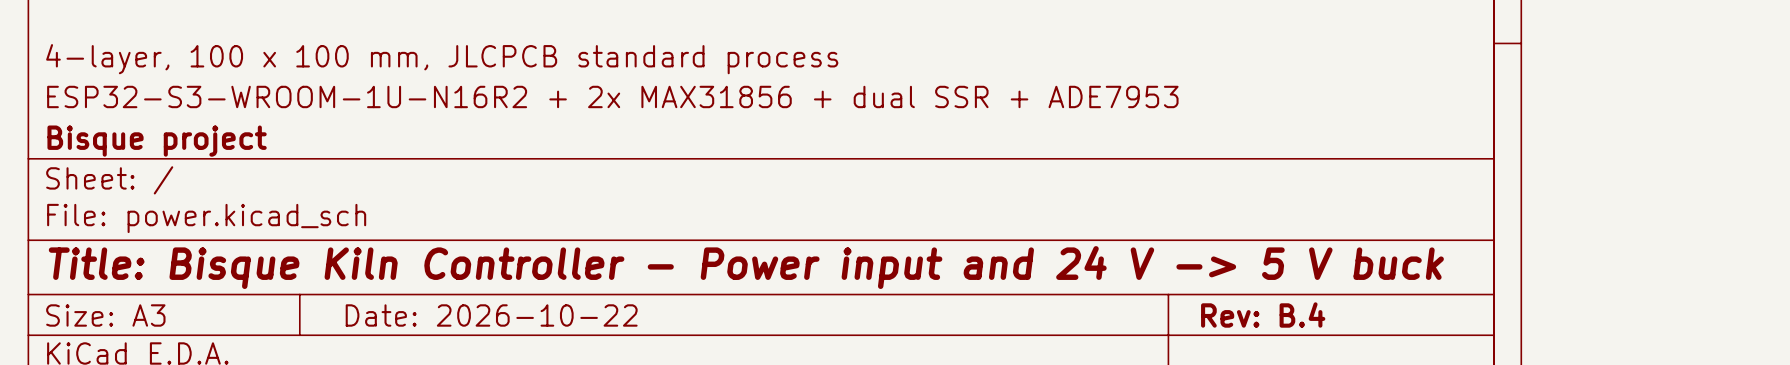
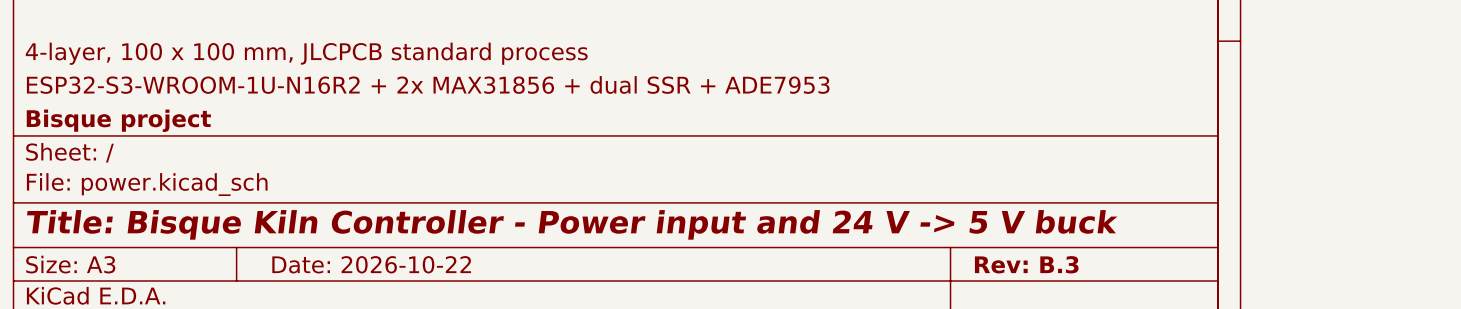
title block: Rev: B.4 (1263, 315) -> Rev: B.3 (1026, 264)

